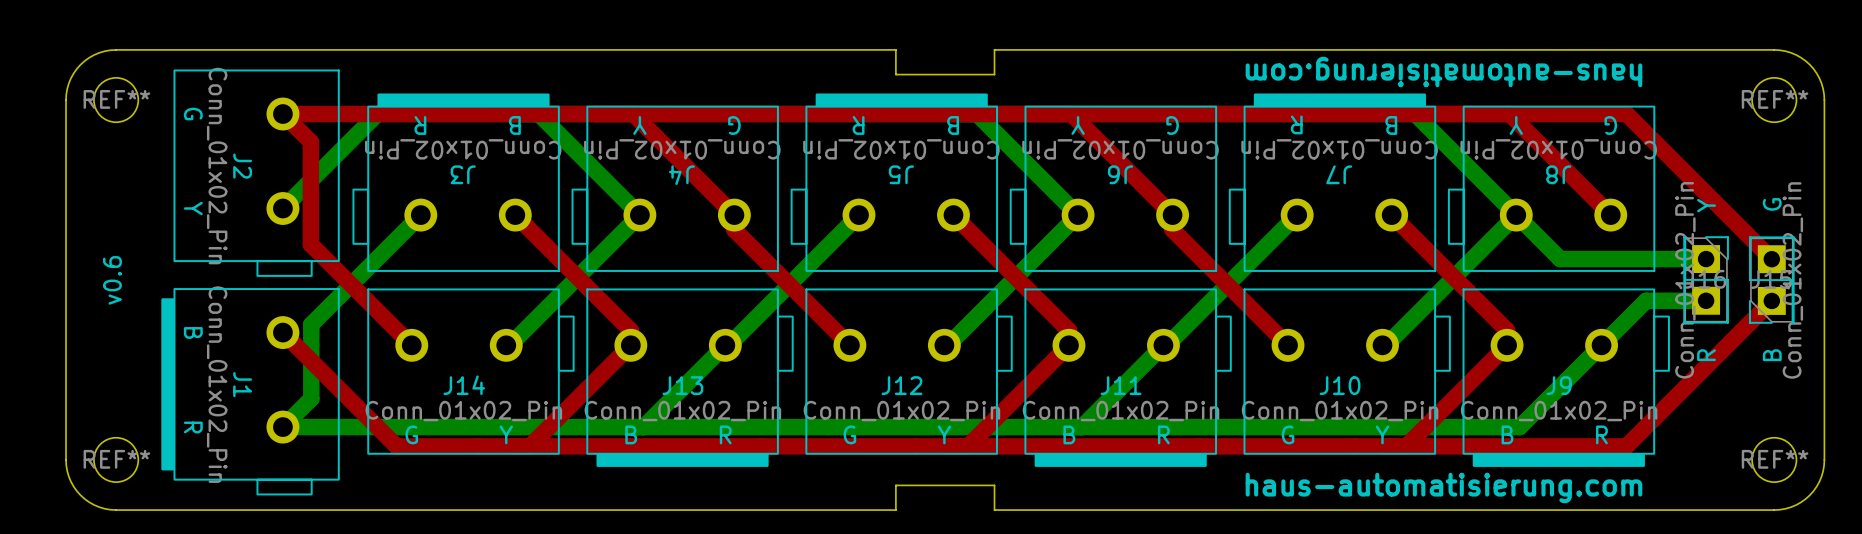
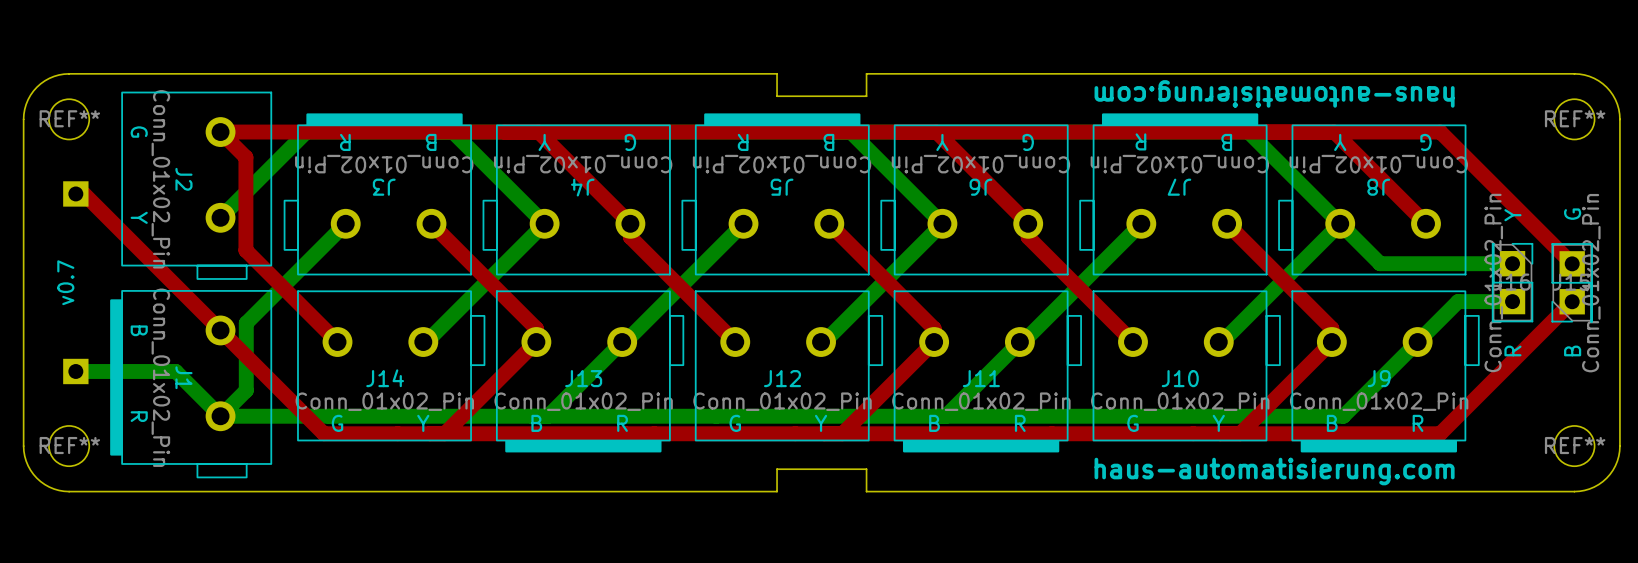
top track: none -> (75, 193) (84, 193) (220, 330)
part: none -> (75, 193)
text: v0.6 (112, 280) -> v0.7 (65, 282)
bottom track: none -> (75, 371) (175, 371) (220, 416)
part: none -> (75, 371)

